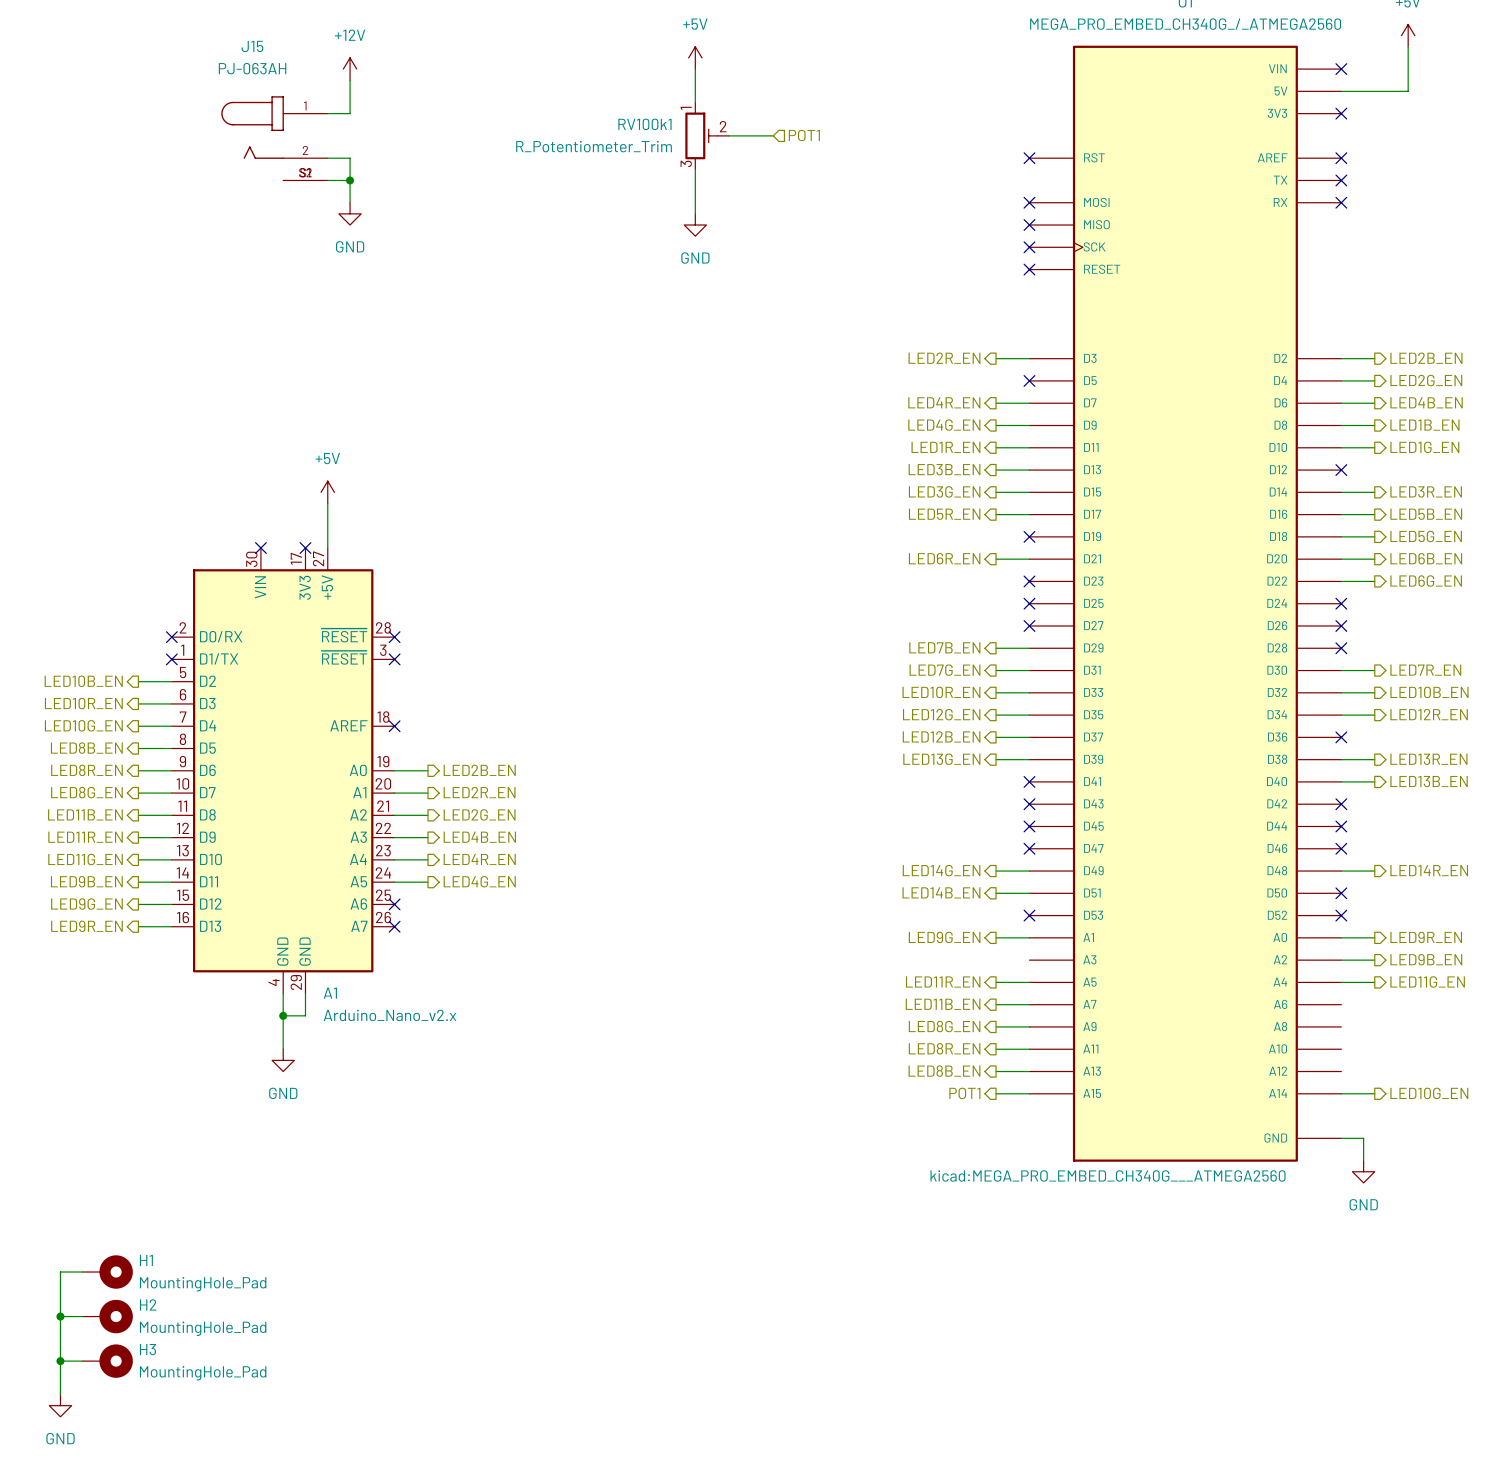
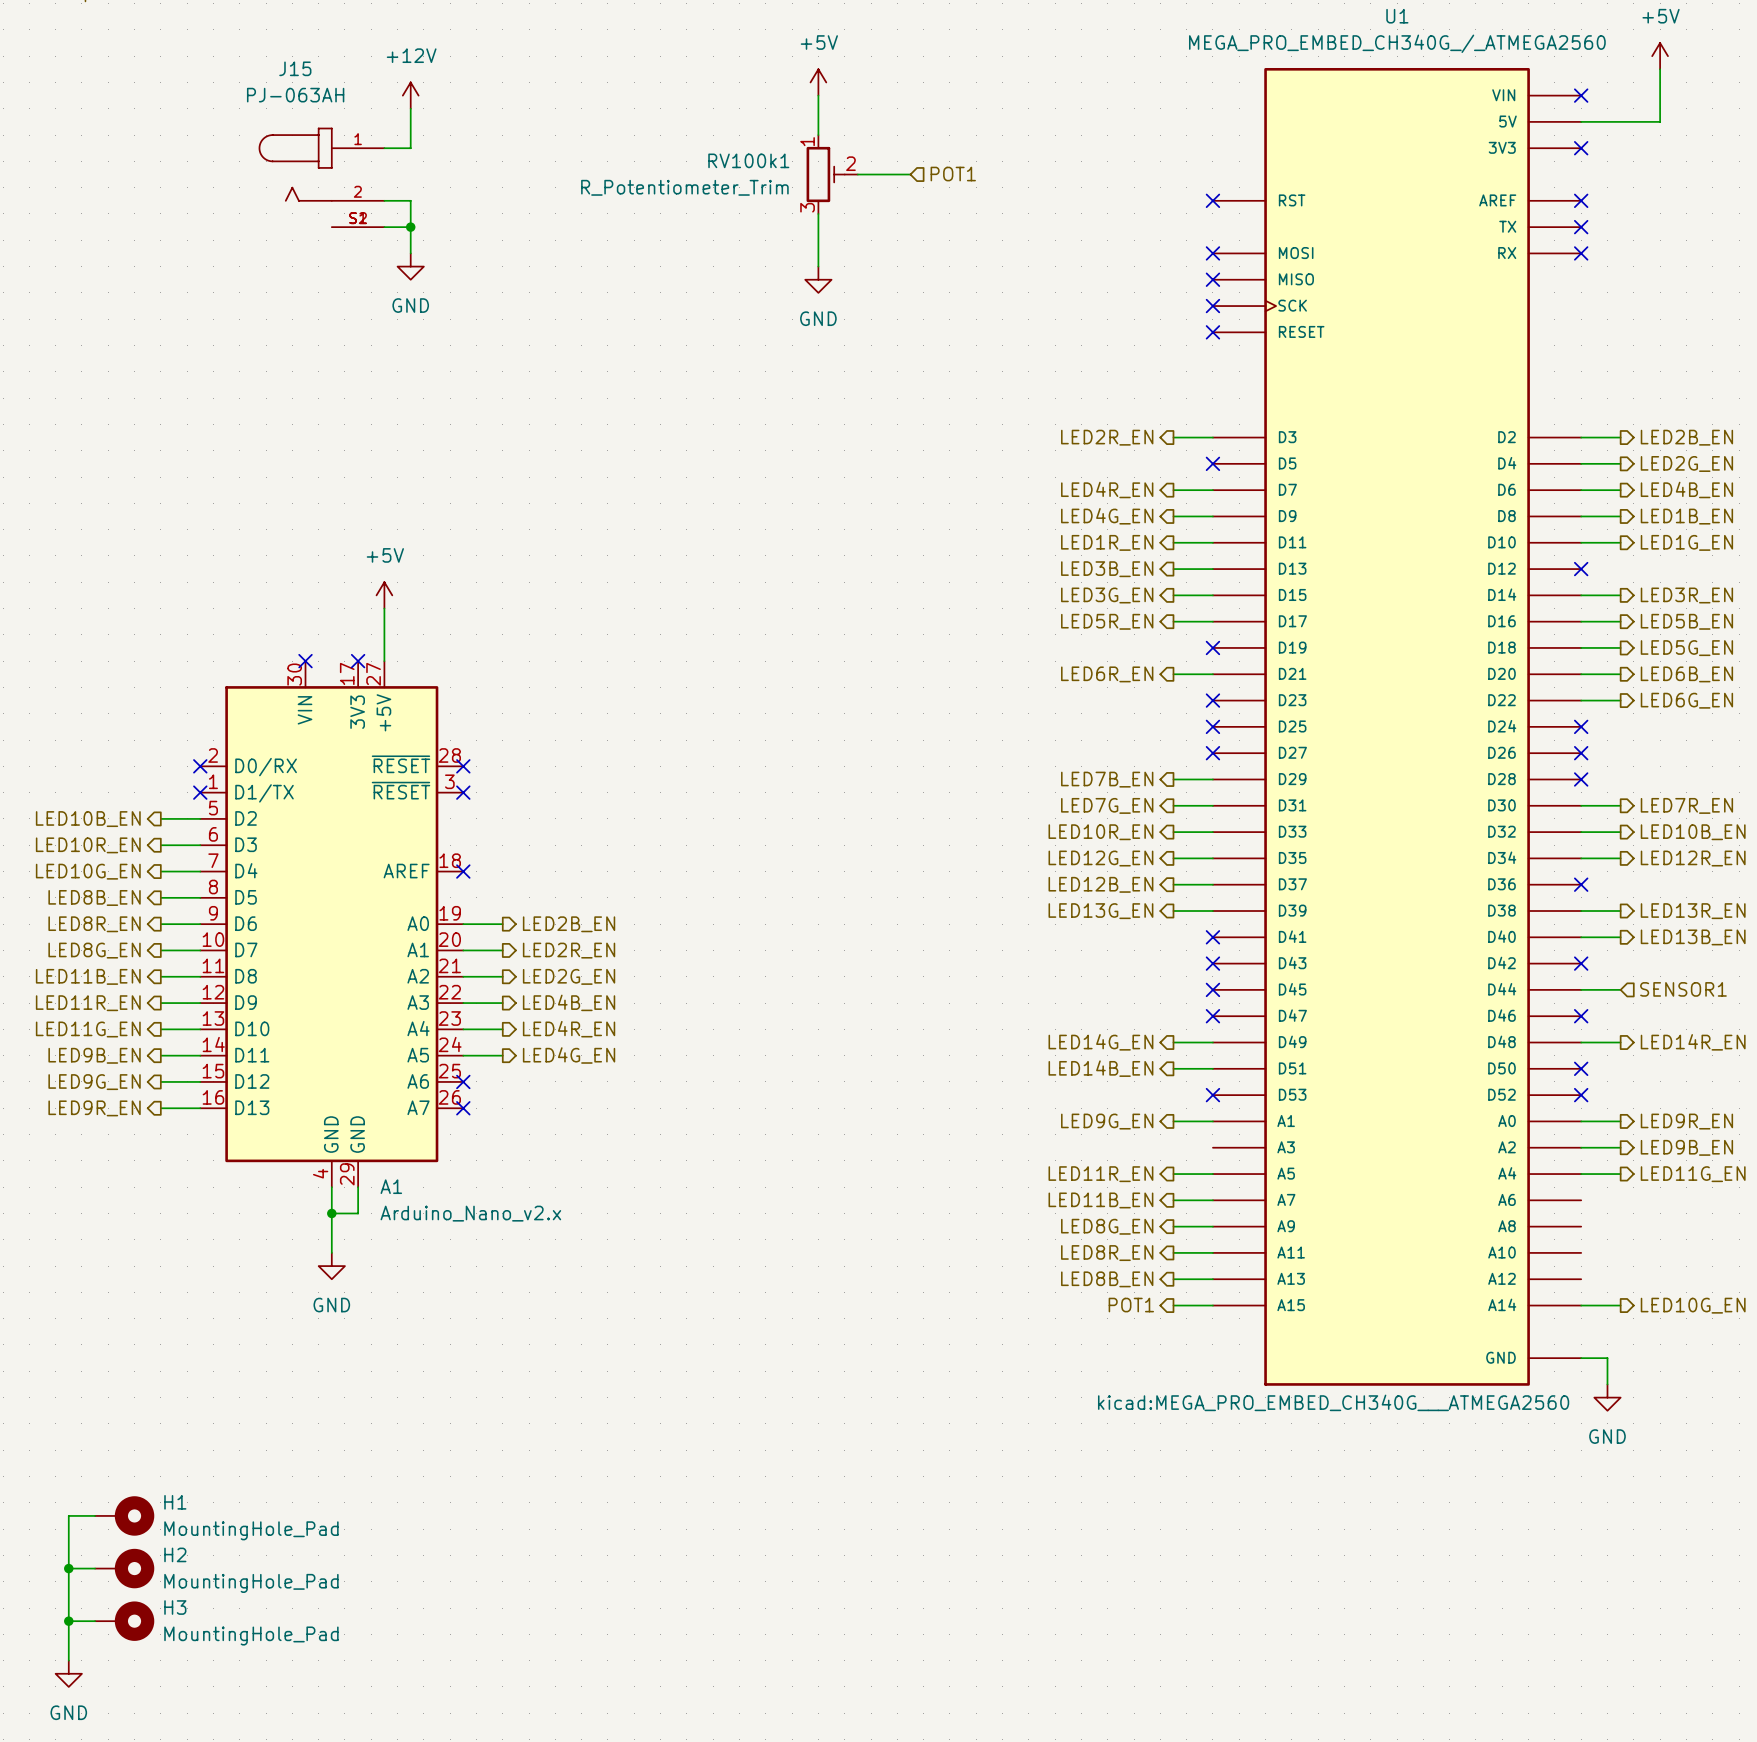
wire: none -> (1581, 989) (1620, 989)
no-connect mark: (1341, 826) -> none
hierarchical label: none -> SENSOR1 (1683, 989)

